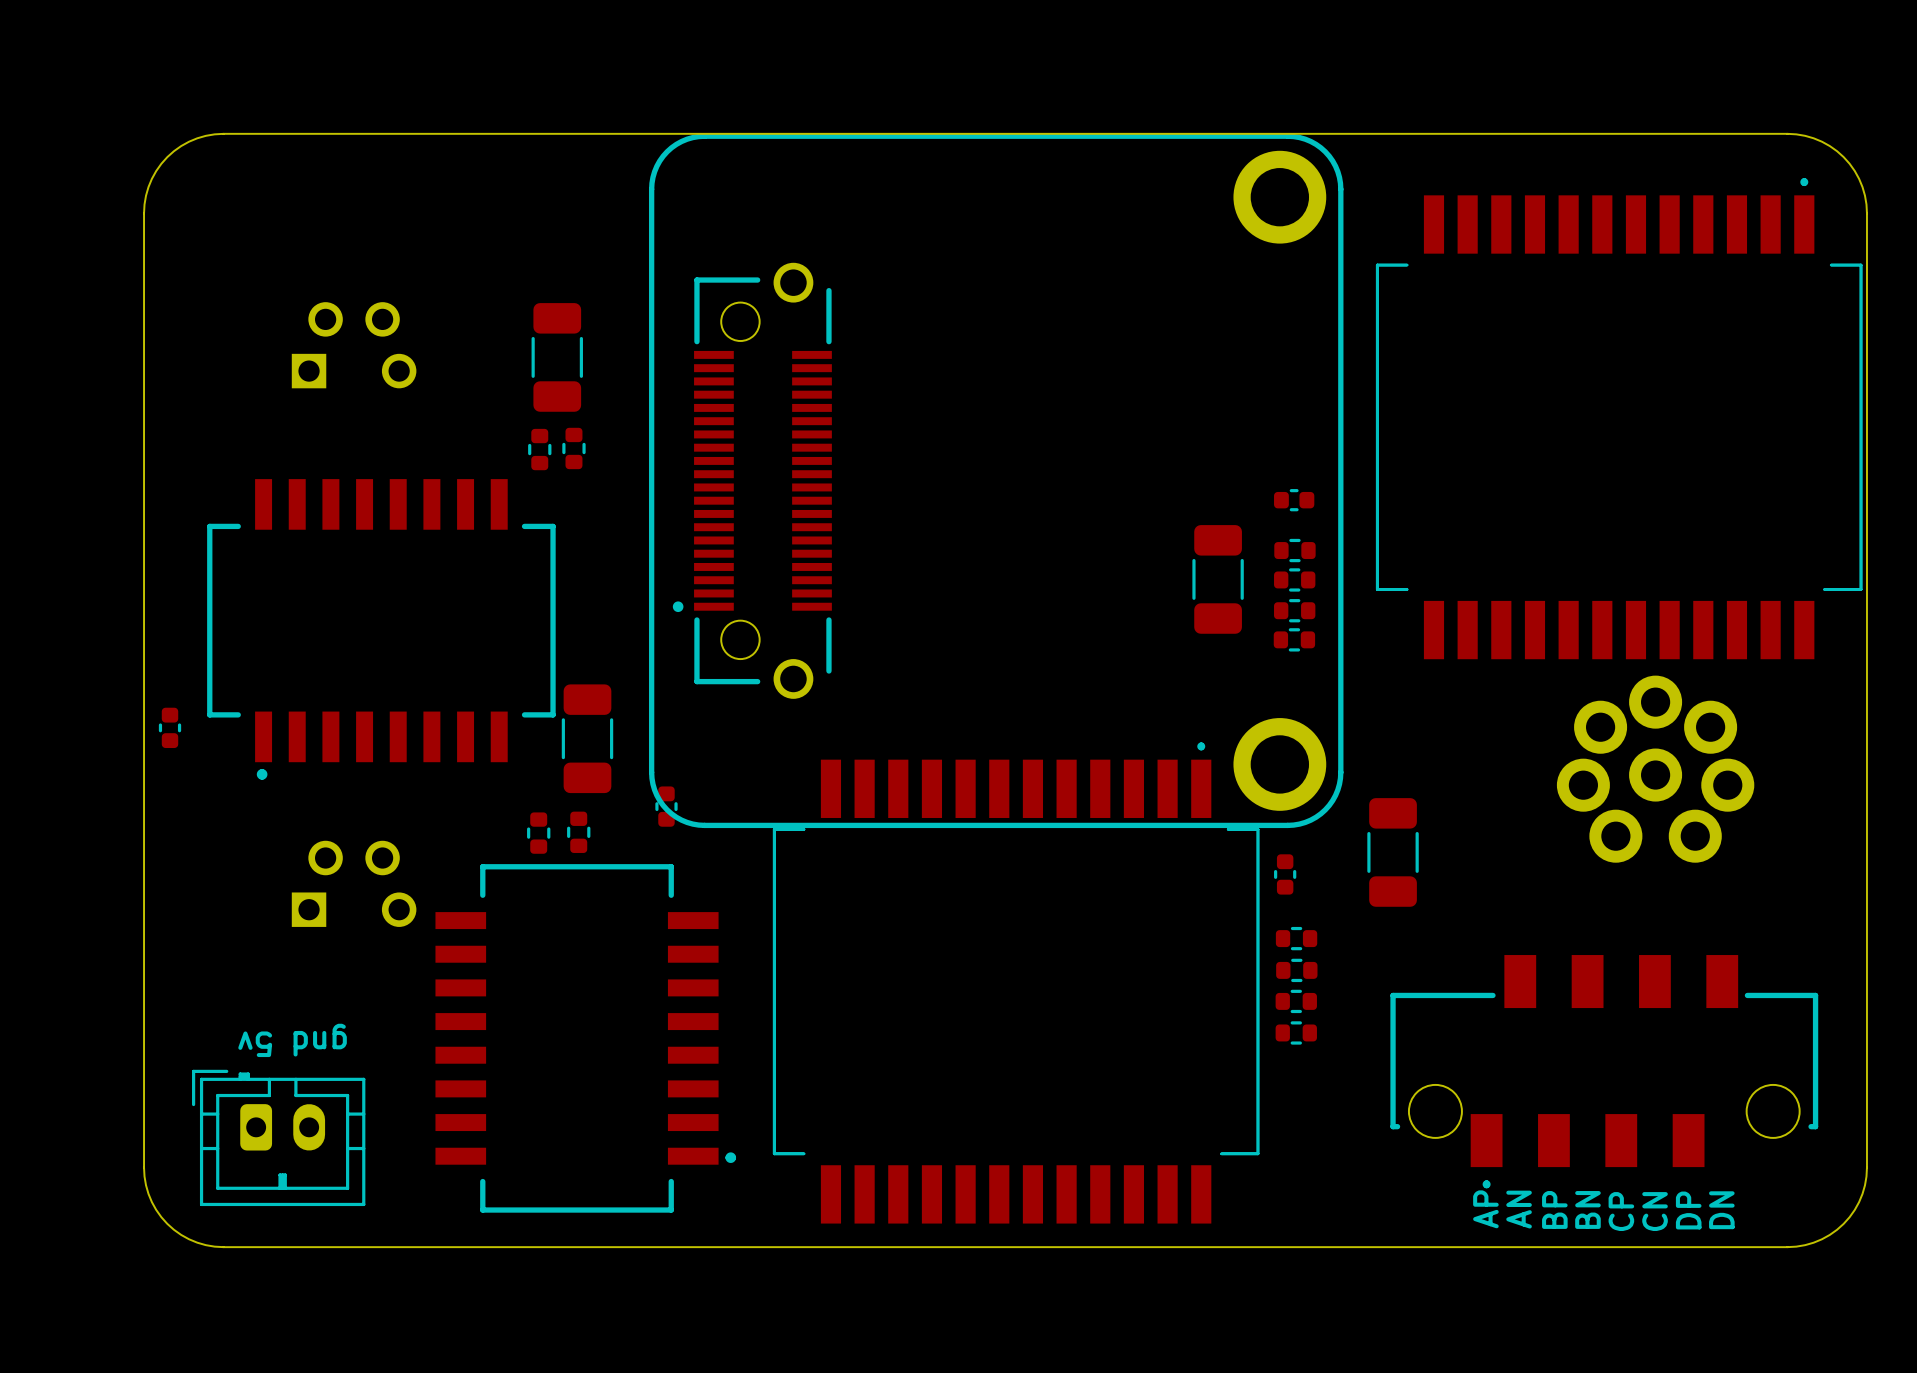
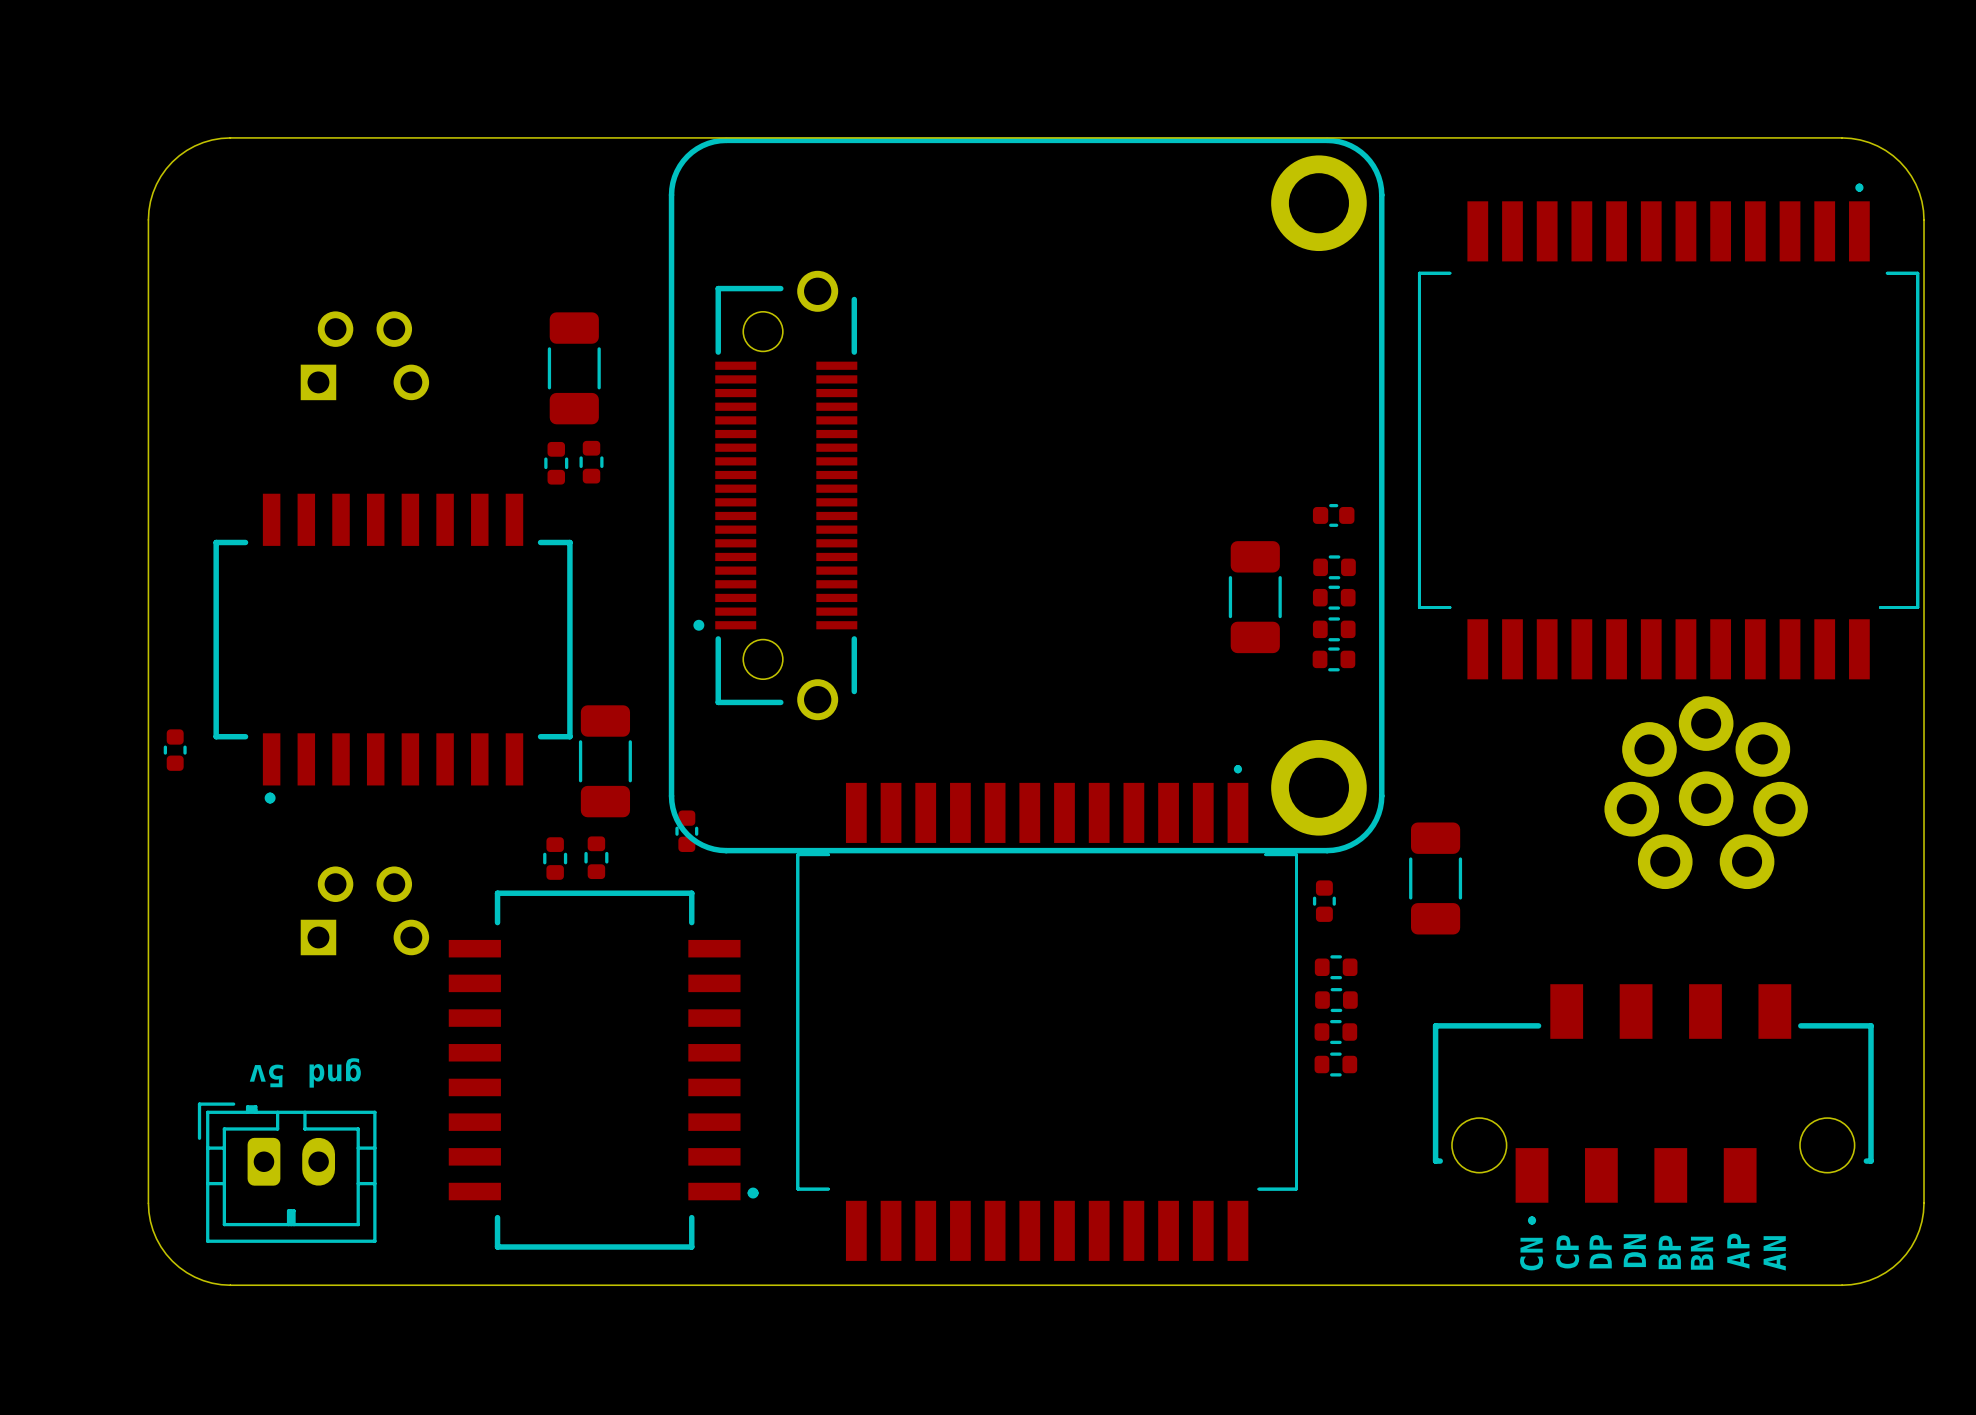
text: AP (1485, 1209) -> CN (1531, 1254)
text: AN (1519, 1209) -> CP (1567, 1251)
text: BP (1554, 1209) -> DP (1600, 1251)
text: BN (1587, 1209) -> DN (1634, 1250)
text: DP (1688, 1210) -> AP (1738, 1251)
text: DN (1721, 1210) -> AN (1774, 1253)
text: CP (1621, 1211) -> BP (1669, 1252)
text: CN (1655, 1211) -> BN (1702, 1253)

